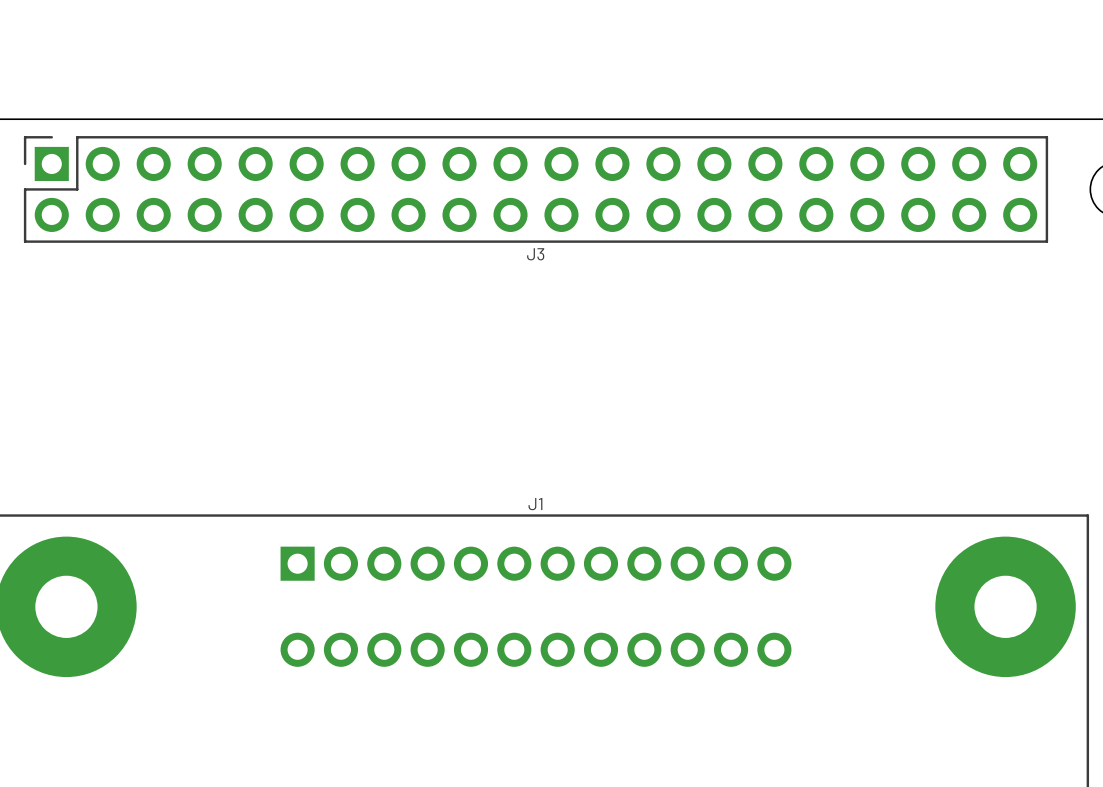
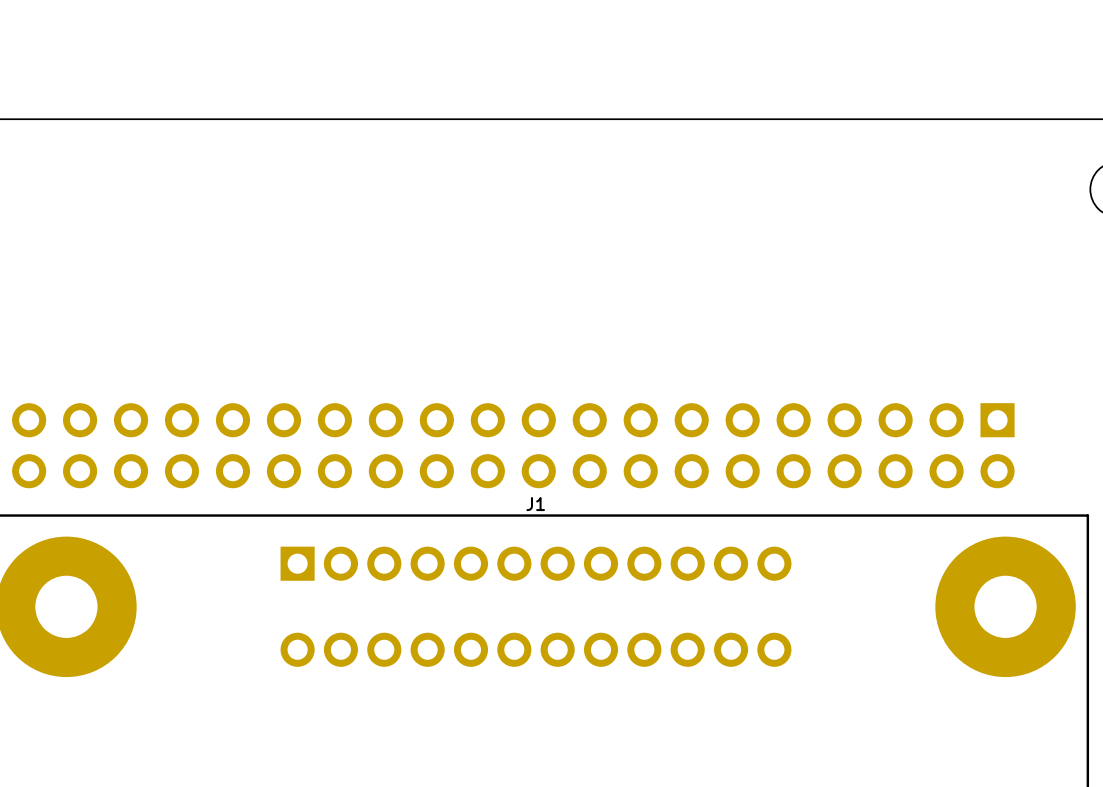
J3 side: bottom (536, 189) -> top (513, 445)

